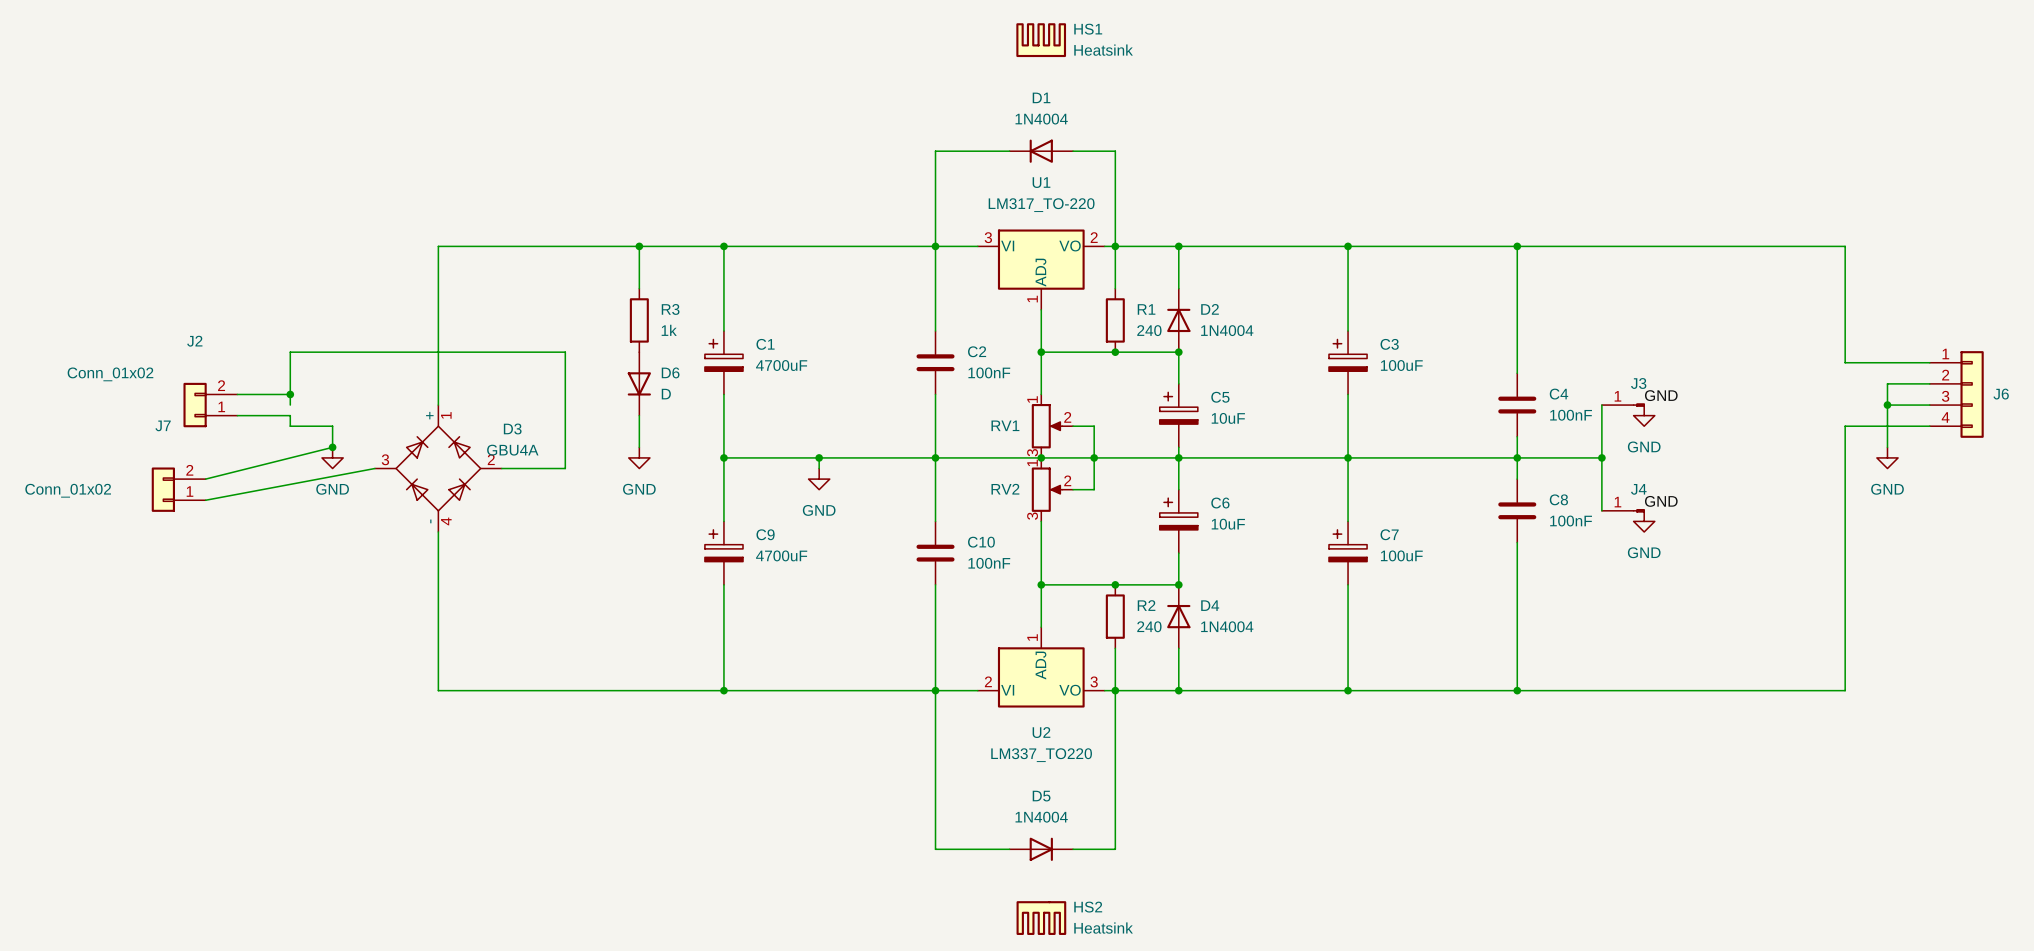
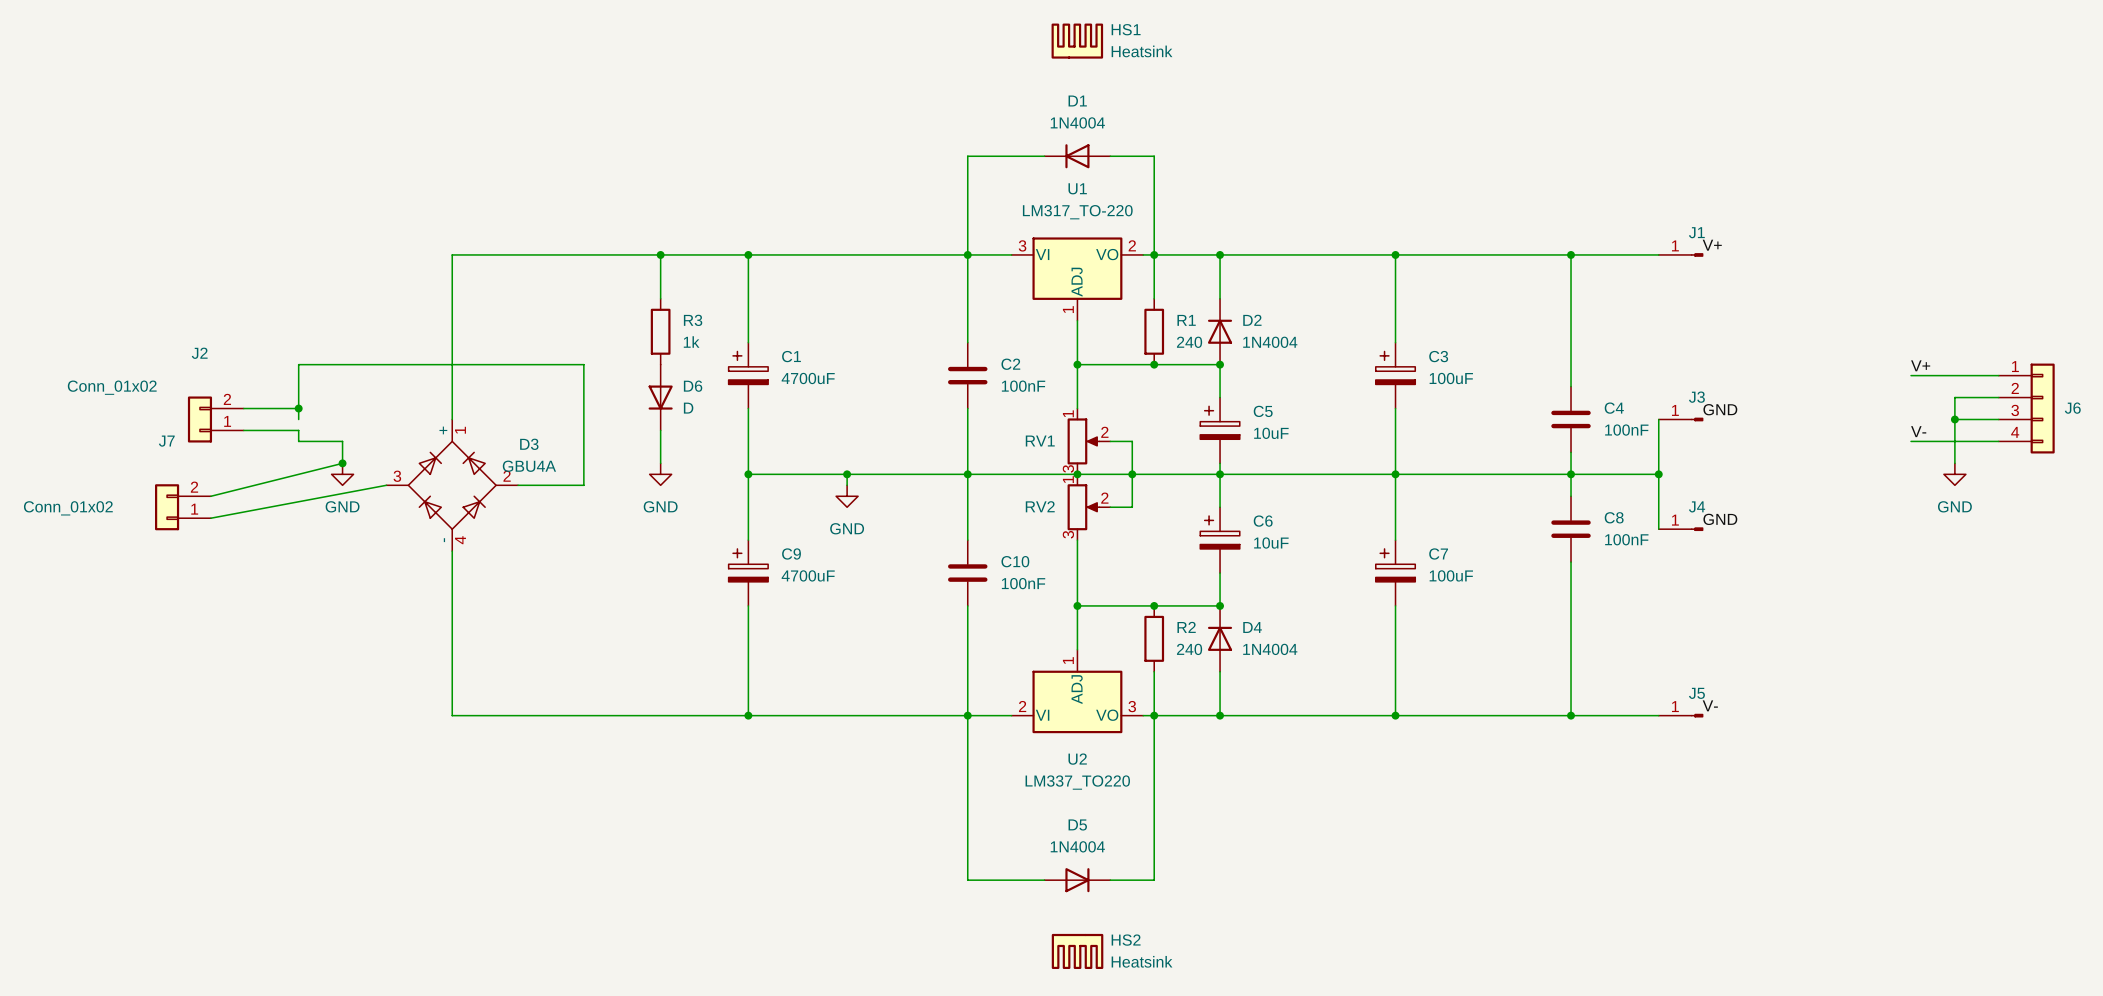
label: none -> V+ (1712, 245)
wire: (1601, 246) (1845, 246) (1845, 362) -> none
J1: none -> (1681, 254)
label: none -> V+ (1920, 365)
power symbol: GND (1644, 415) -> none
label: none -> V- (1918, 431)
wire: (1845, 426) (1845, 690) (1601, 690) -> none
power symbol: GND (1644, 521) -> none
label: none -> V- (1710, 705)
J5: none -> (1681, 715)

